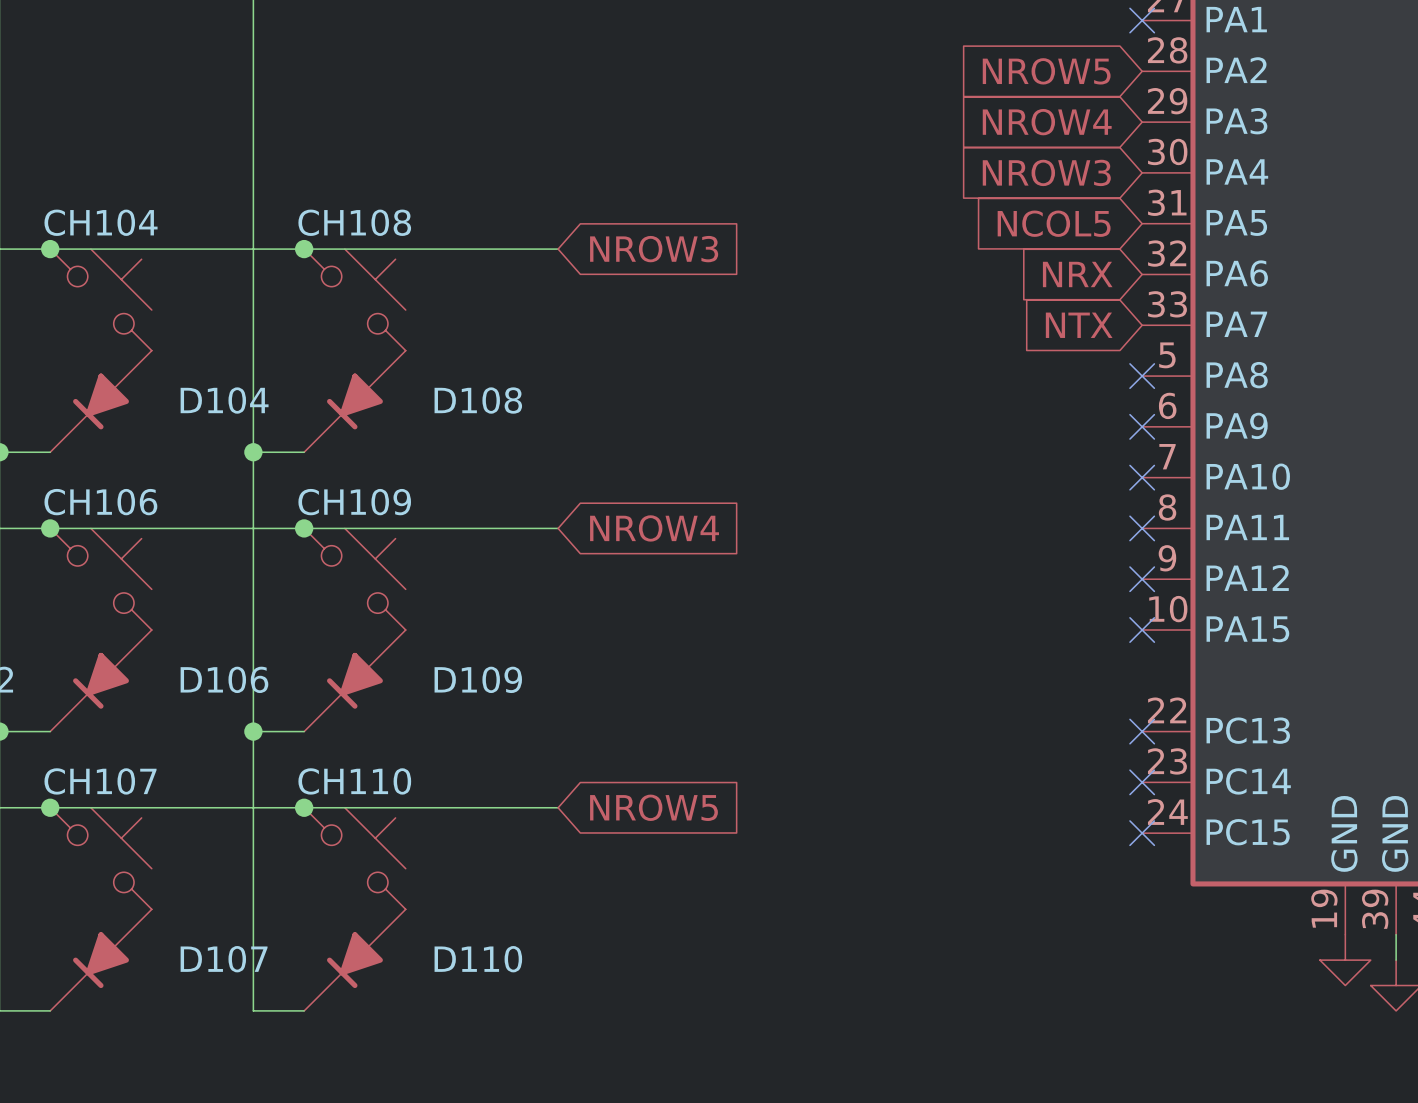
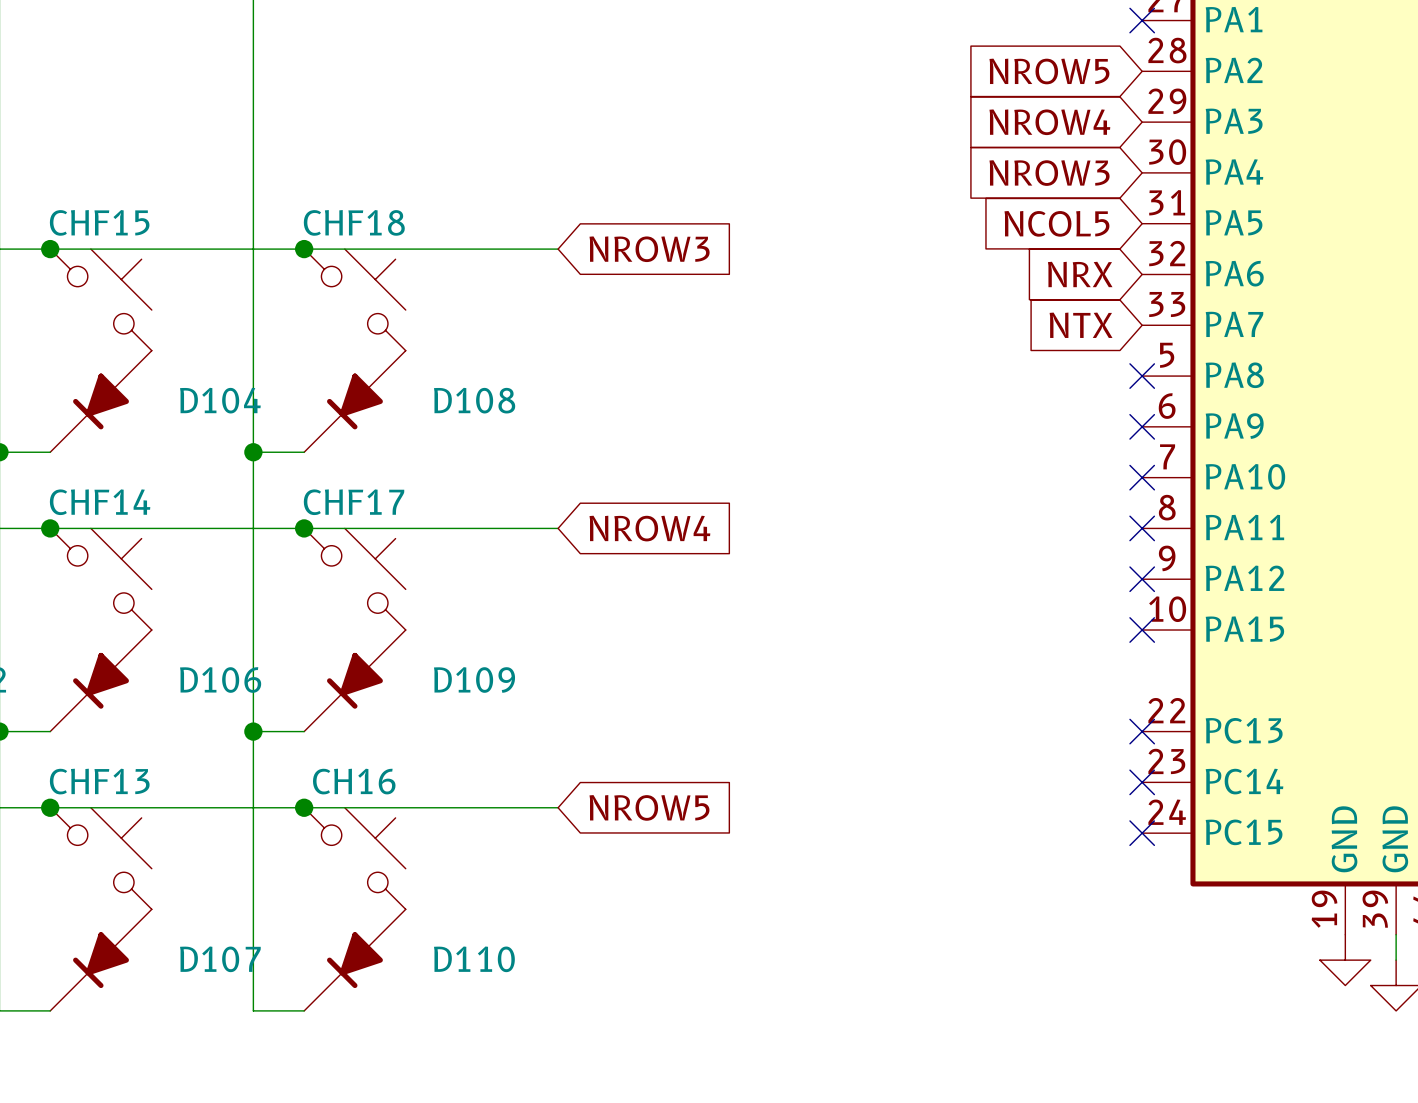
CH104 name: CH104 (101, 222) -> CHF15 (99, 222)
CH108 name: CH108 (354, 222) -> CHF18 (354, 222)
CH106 name: CH106 (100, 502) -> CHF14 (100, 502)
CH109 name: CH109 (354, 502) -> CHF17 (354, 502)
CH107 name: CH107 (100, 781) -> CHF13 (99, 781)
CH110 name: CH110 (354, 781) -> CH16 (354, 781)

